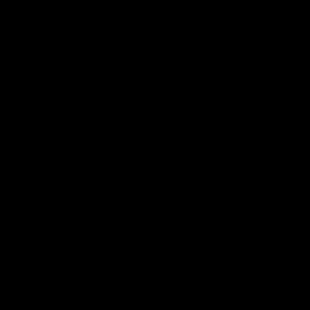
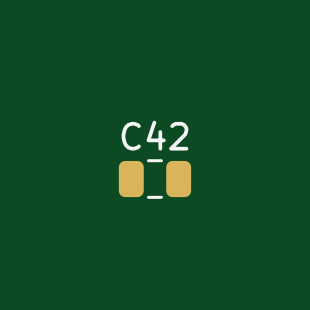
C42: none -> (154, 179)

